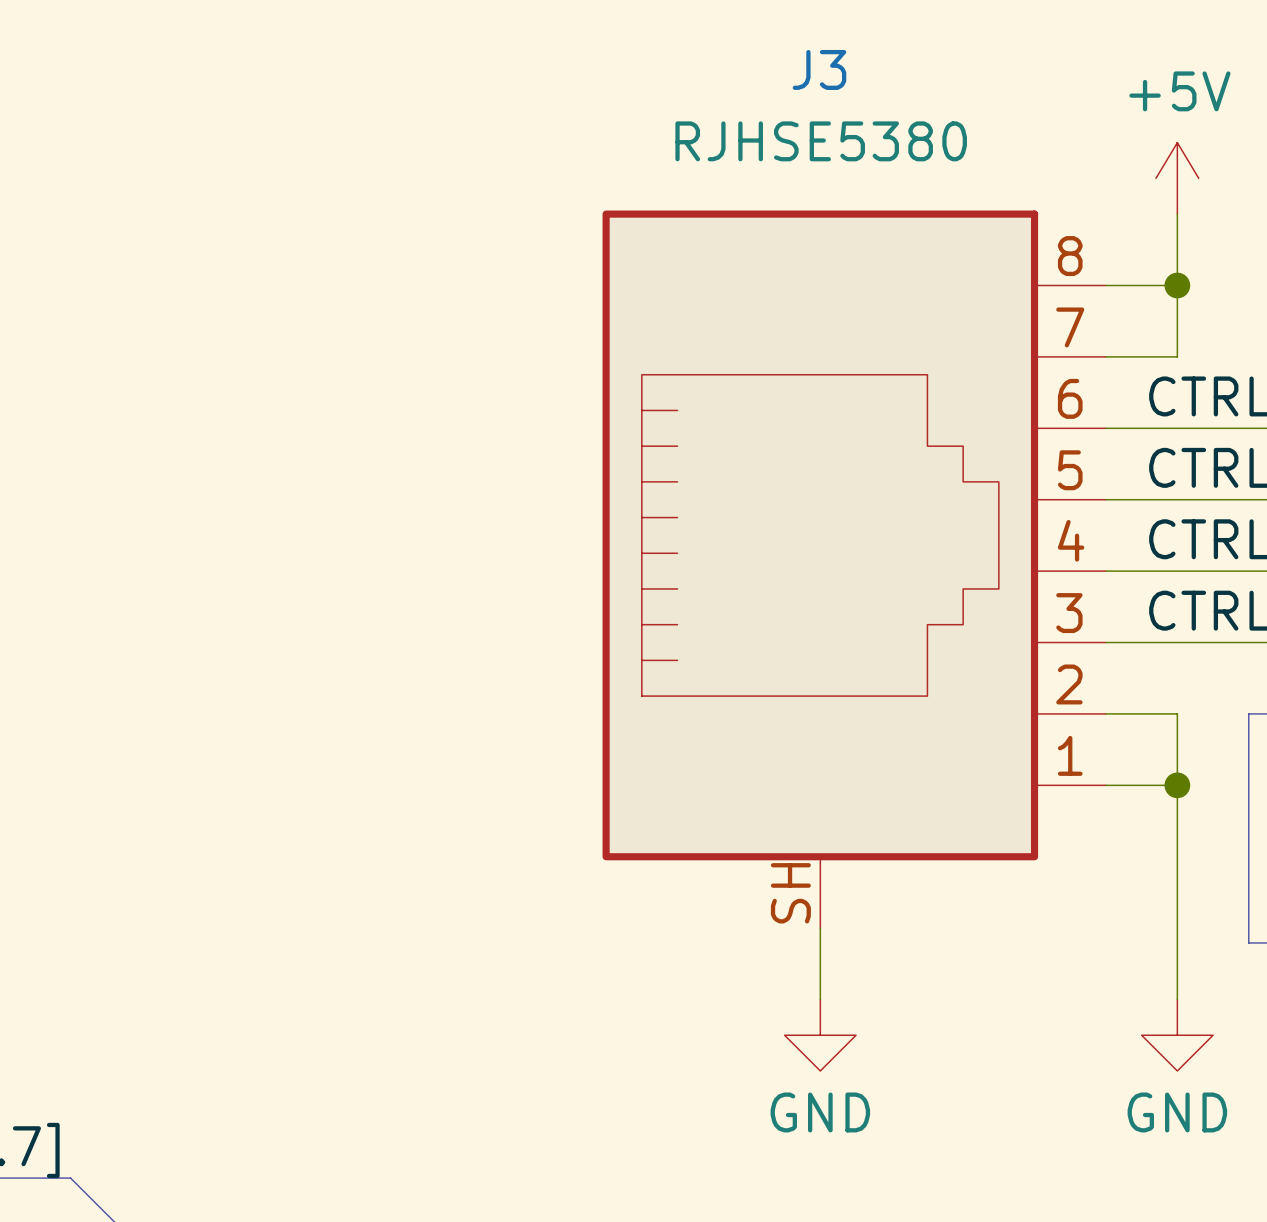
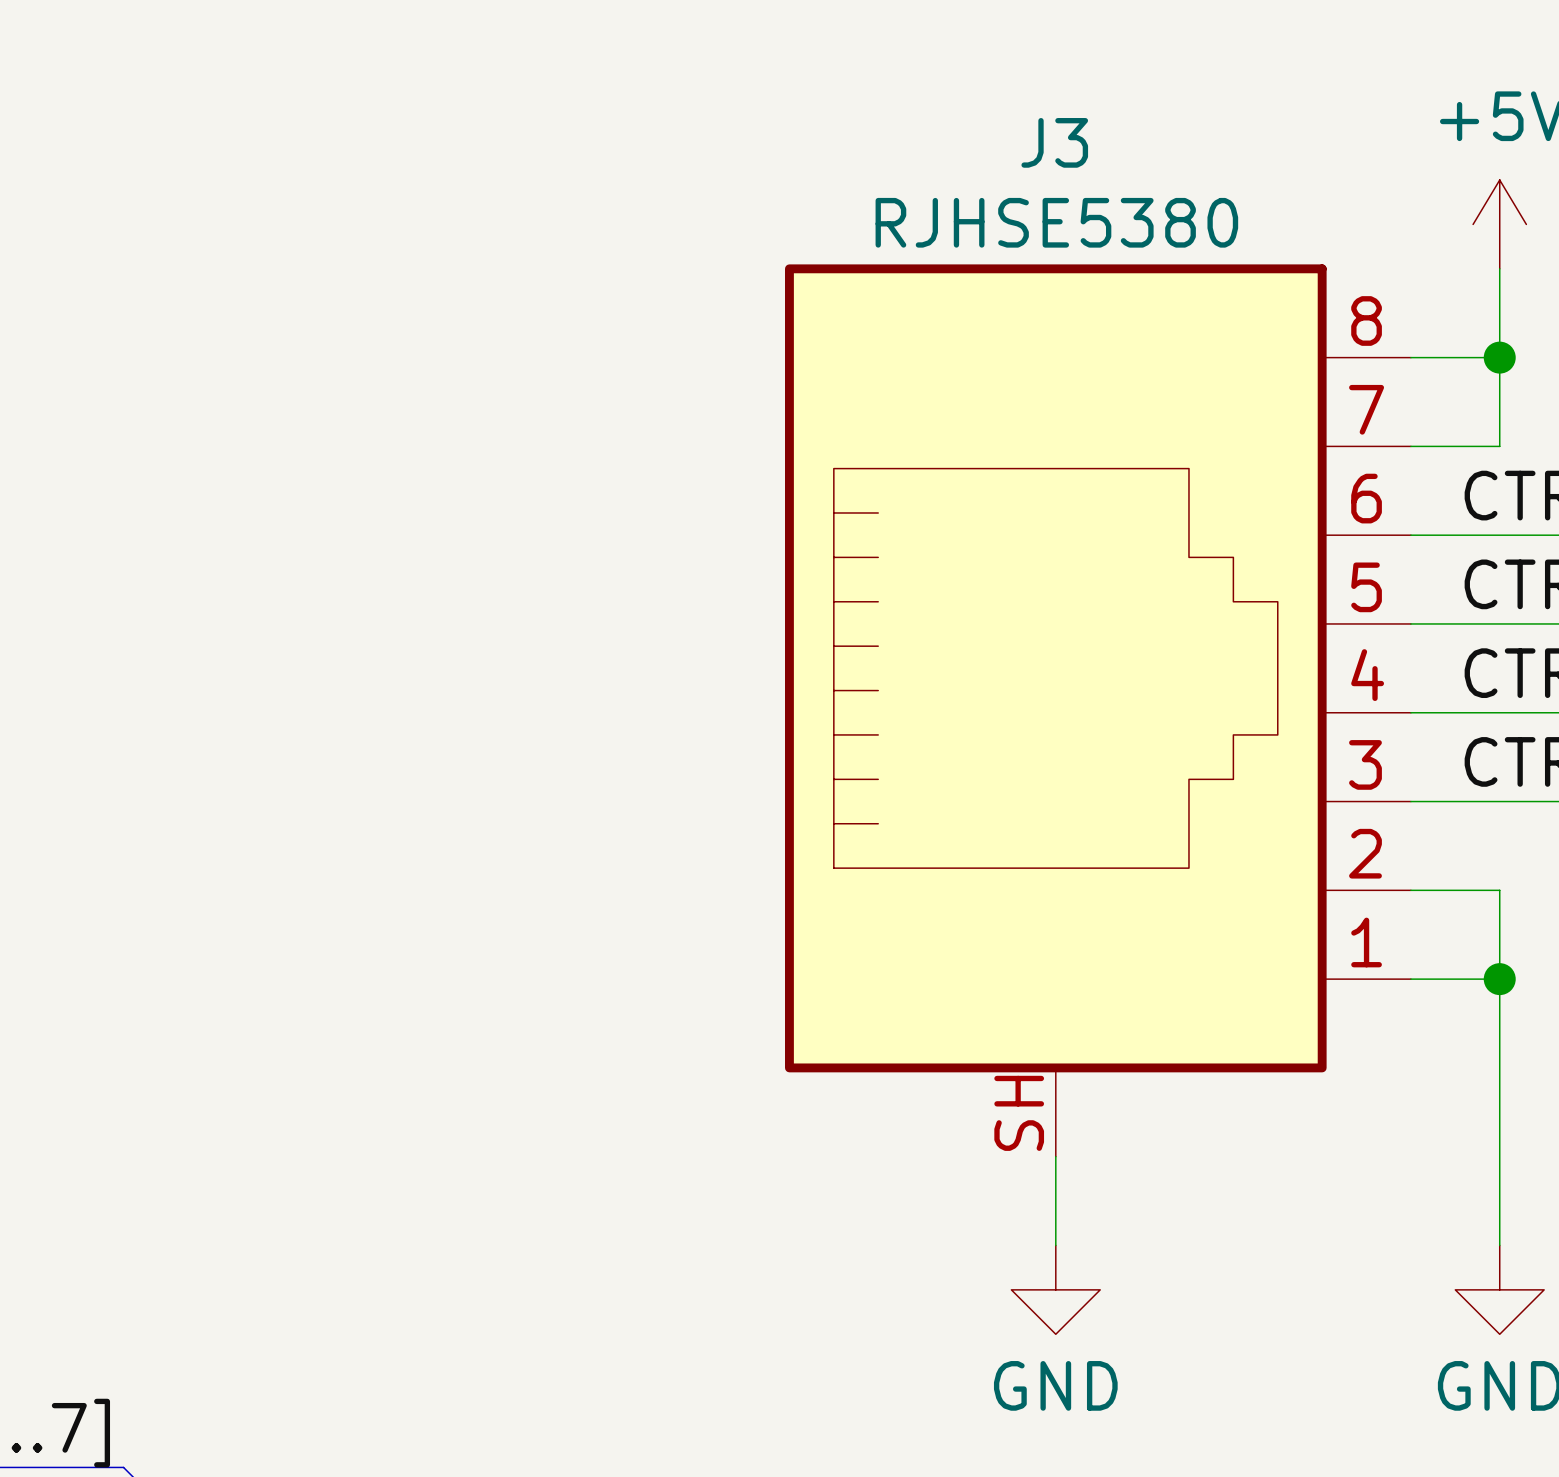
J3 name position: J3 (819, 69) -> J3 (1054, 142)
J3 value position: RJHSE5380 (821, 141) -> RJHSE5380 (1056, 222)

